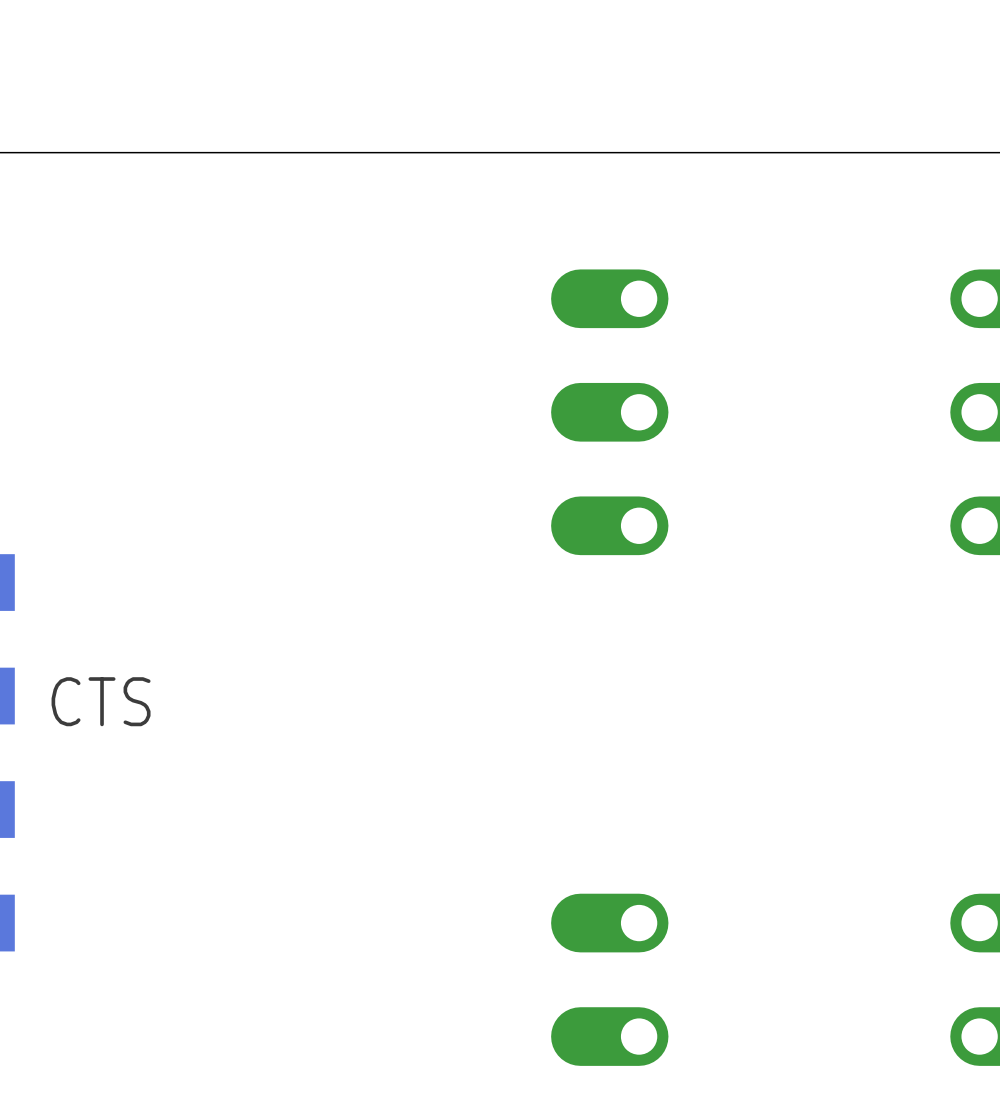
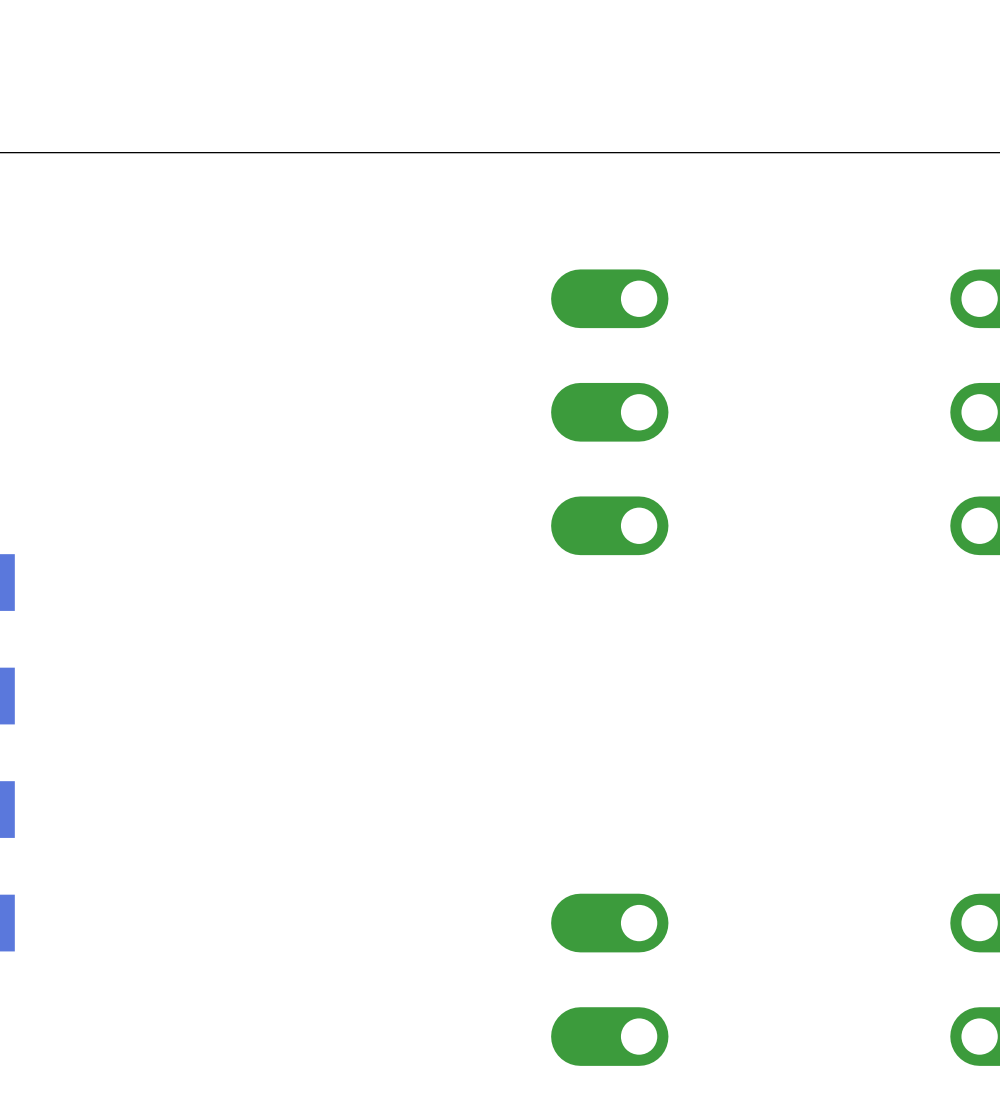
text: CTS (101, 701) -> none

